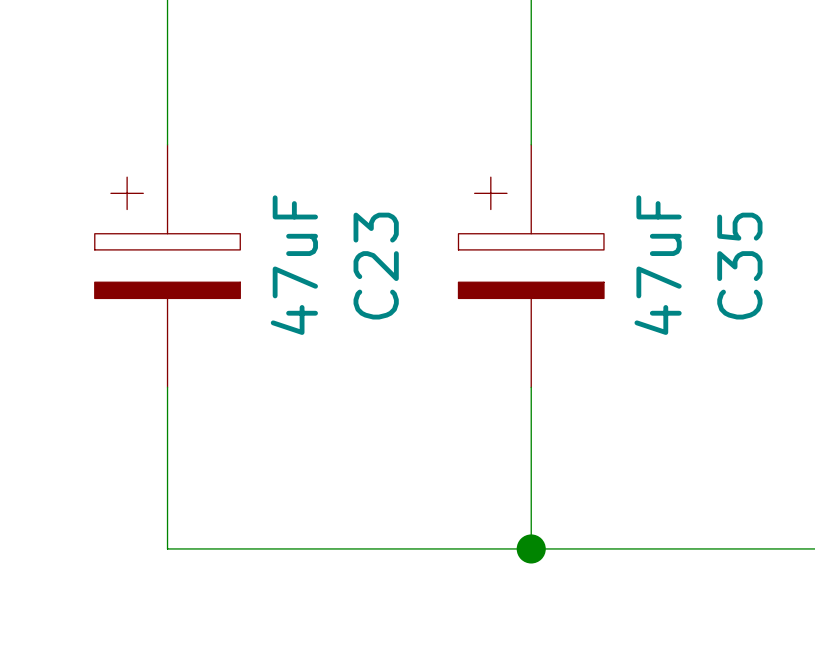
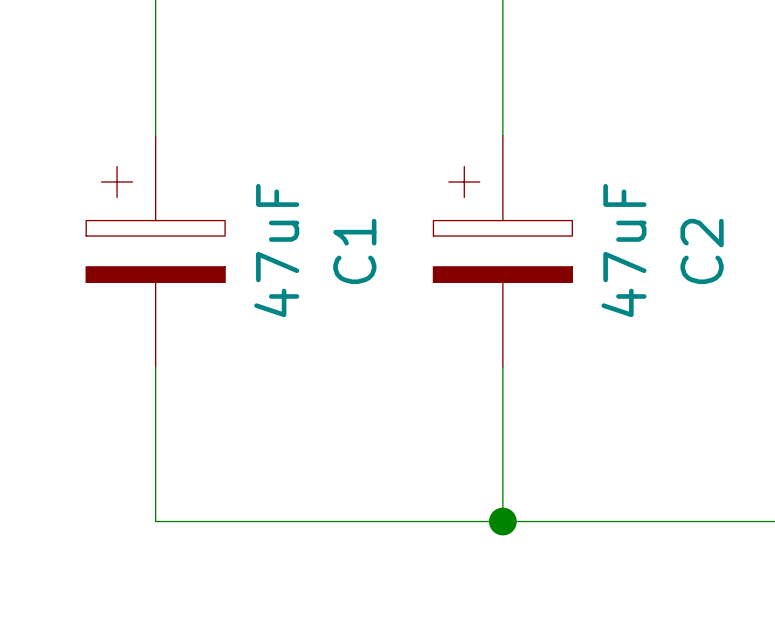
C23 name: C23 (376, 266) -> C1 (354, 251)
C35 name: C35 (739, 266) -> C2 (702, 251)

